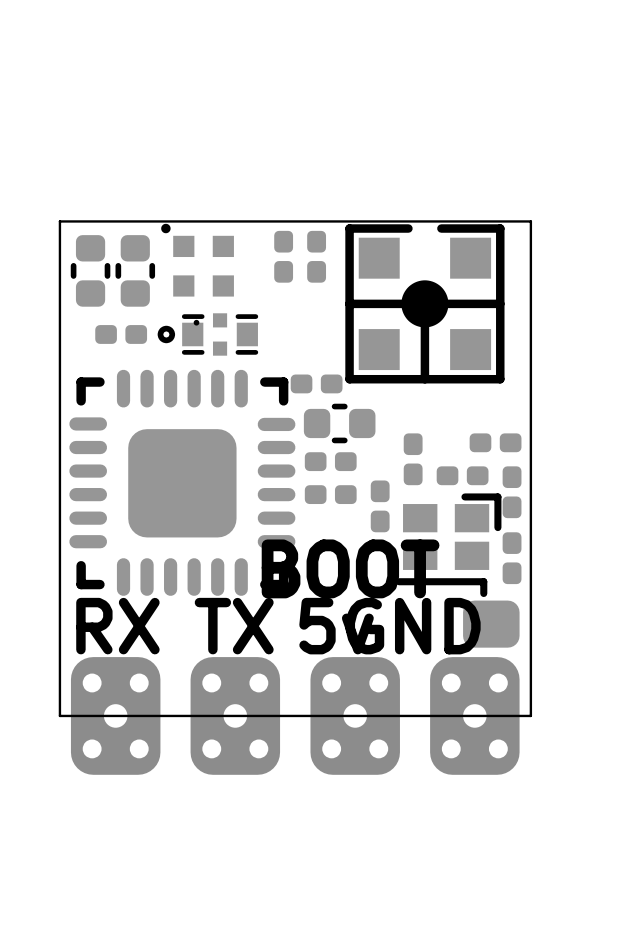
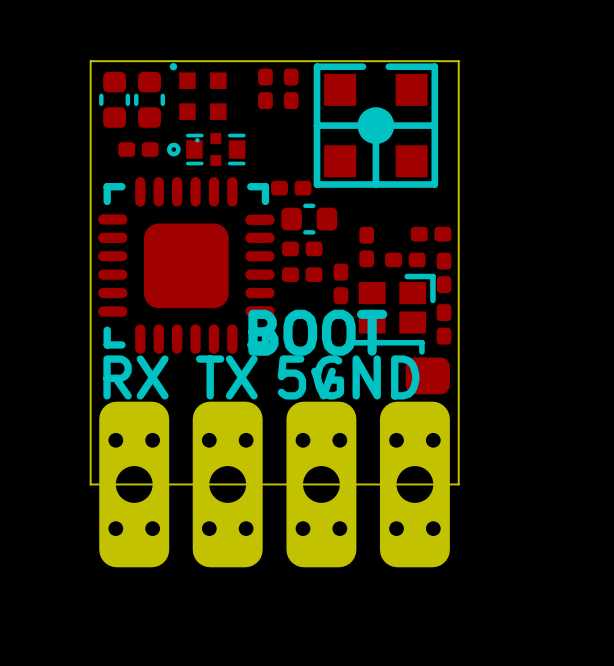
part footprint: [70, 657, 161, 775] -> [99, 401, 170, 568]
part footprint: [190, 657, 281, 775] -> [192, 401, 263, 568]
part footprint: [310, 657, 400, 775] -> [286, 401, 357, 568]
part footprint: [430, 657, 520, 775] -> [379, 401, 450, 568]
board edge: (59, 715) (530, 715) -> (90, 447) (90, 484) (458, 484) (458, 447)

